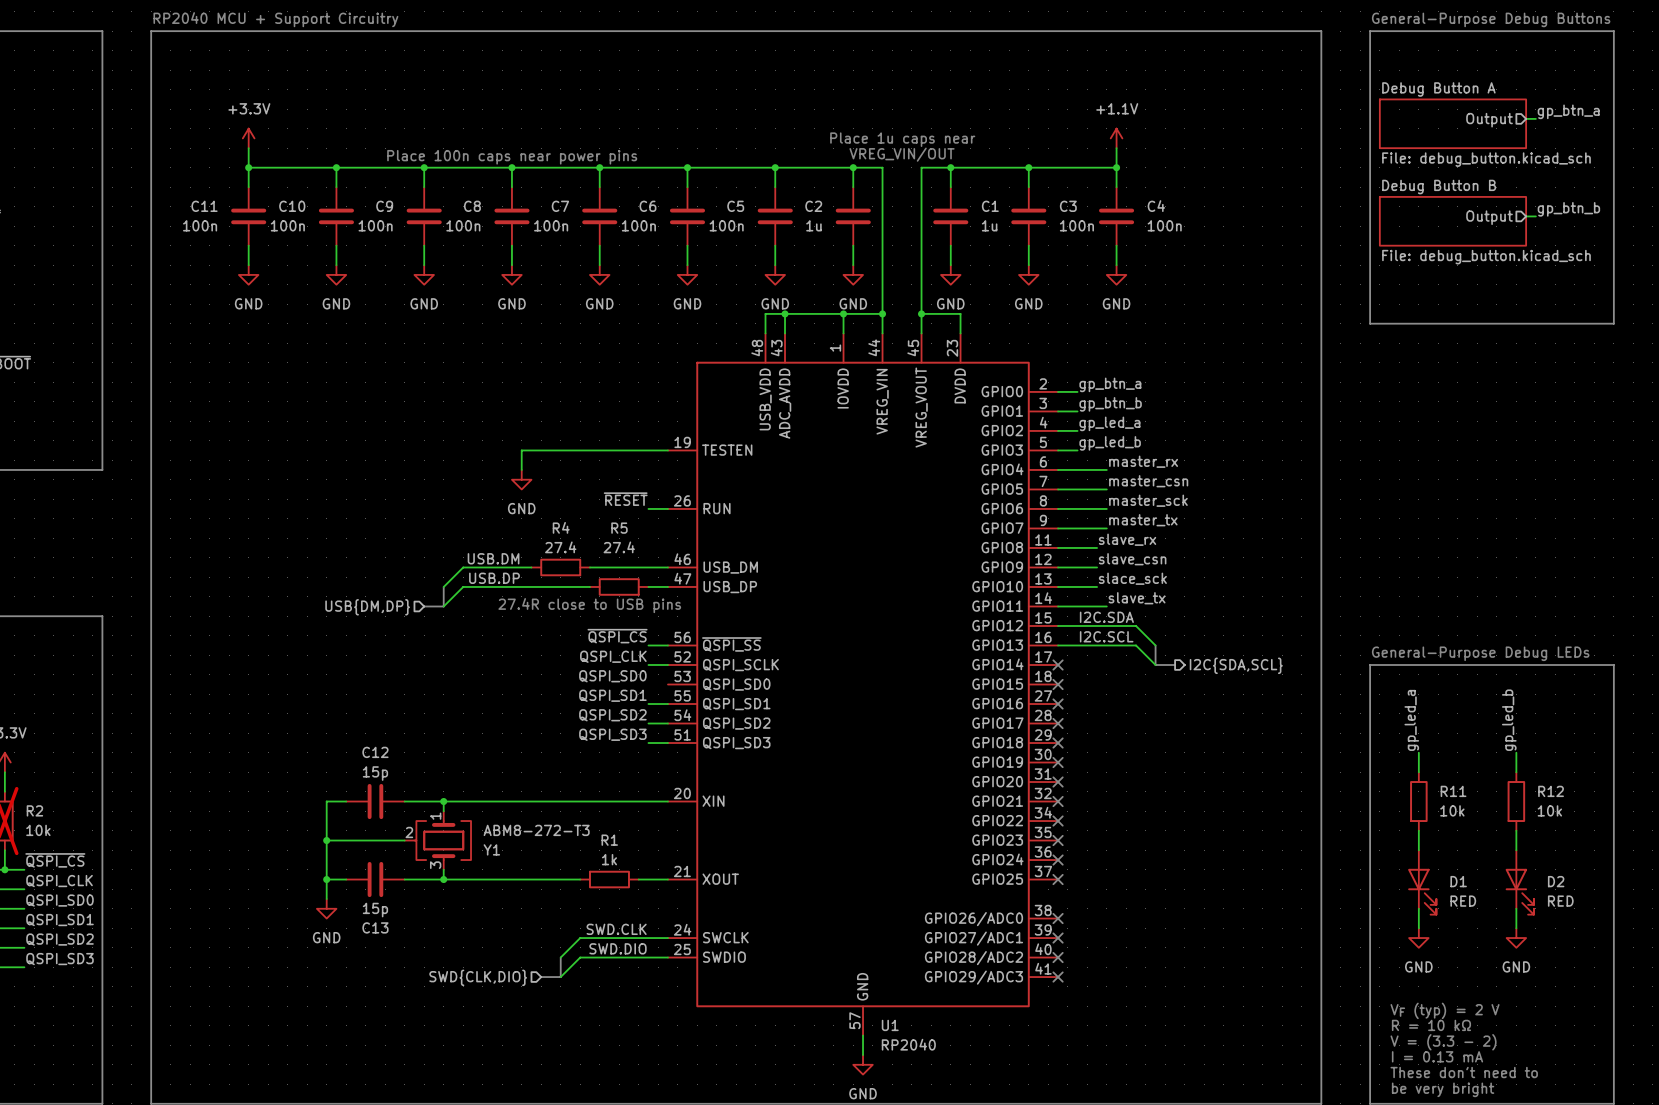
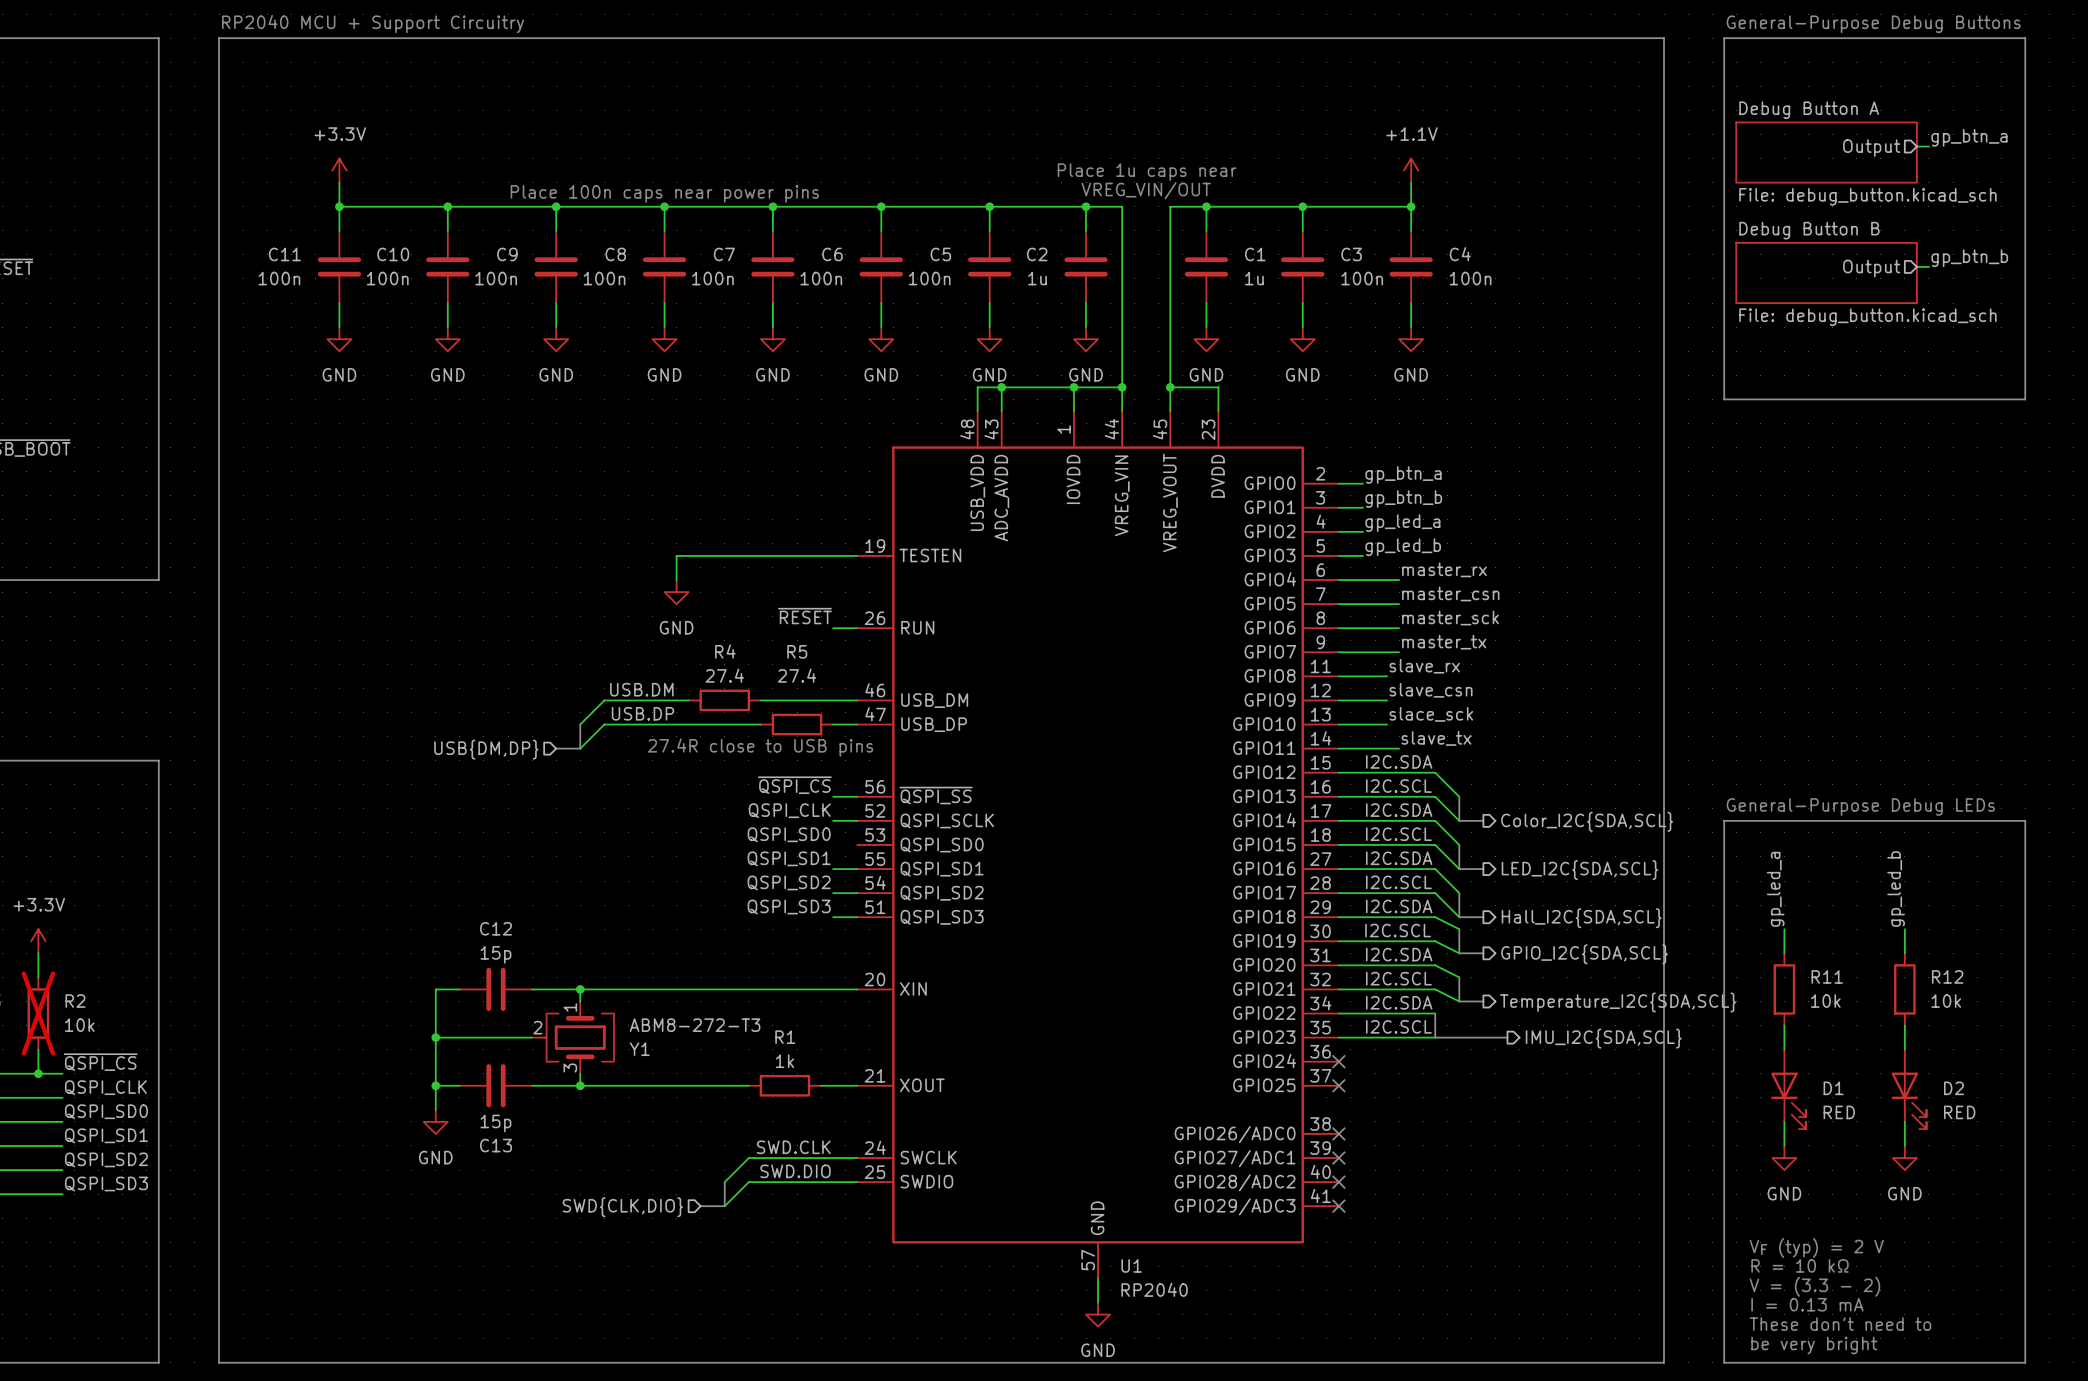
label: none -> I2C.SDA (1399, 810)
wire: none -> (1338, 820) (1435, 820) (1459, 844)
no-connect mark: (1058, 664) -> none
hierarchical label: I2C{SDA,SCL} (1236, 665) -> Color_I2C{SDA,SCL} (1587, 821)
label: none -> I2C.SCL (1398, 834)
wire: none -> (1338, 844) (1435, 844) (1459, 869)
no-connect mark: (1058, 684) -> none
bus: none -> (1459, 844) (1459, 869) (1483, 869)
label: none -> I2C.SDA (1399, 858)
wire: none -> (1338, 869) (1435, 869) (1459, 893)
no-connect mark: (1058, 704) -> none
hierarchical label: none -> LED_I2C{SDA,SCL} (1579, 870)
label: none -> I2C.SCL (1398, 882)
wire: none -> (1338, 893) (1435, 893) (1459, 917)
no-connect mark: (1058, 723) -> none
bus: none -> (1459, 893) (1459, 917) (1483, 917)
label: none -> I2C.SDA (1399, 906)
wire: none -> (1338, 917) (1435, 917) (1459, 929)
no-connect mark: (1058, 743) -> none
hierarchical label: none -> Hall_I2C{SDA,SCL} (1581, 918)
bus: none -> (1459, 929) (1459, 953) (1483, 953)
label: none -> I2C.SCL (1398, 930)
wire: none -> (1338, 941) (1435, 941) (1459, 953)
no-connect mark: (1058, 762) -> none
label: none -> I2C.SDA (1399, 954)
hierarchical label: none -> GPIO_I2C{SDA,SCL} (1584, 954)
wire: none -> (1338, 965) (1435, 965) (1459, 977)
no-connect mark: (1058, 782) -> none
bus: none -> (1459, 977) (1459, 1001) (1483, 1001)
label: none -> I2C.SCL (1398, 978)
wire: none -> (1338, 989) (1435, 989) (1459, 1001)
no-connect mark: (1058, 801) -> none
label: none -> I2C.SDA (1399, 1002)
hierarchical label: none -> Temperature_I2C{SDA,SCL} (1618, 1002)
wire: none -> (1338, 1013) (1435, 1013)
no-connect mark: (1058, 821) -> none
bus: none -> (1435, 1013) (1435, 1037) (1507, 1037)
label: none -> I2C.SCL (1398, 1026)
wire: none -> (1338, 1037) (1435, 1037)
no-connect mark: (1058, 840) -> none
hierarchical label: none -> IMU_I2C{SDA,SCL} (1603, 1038)

